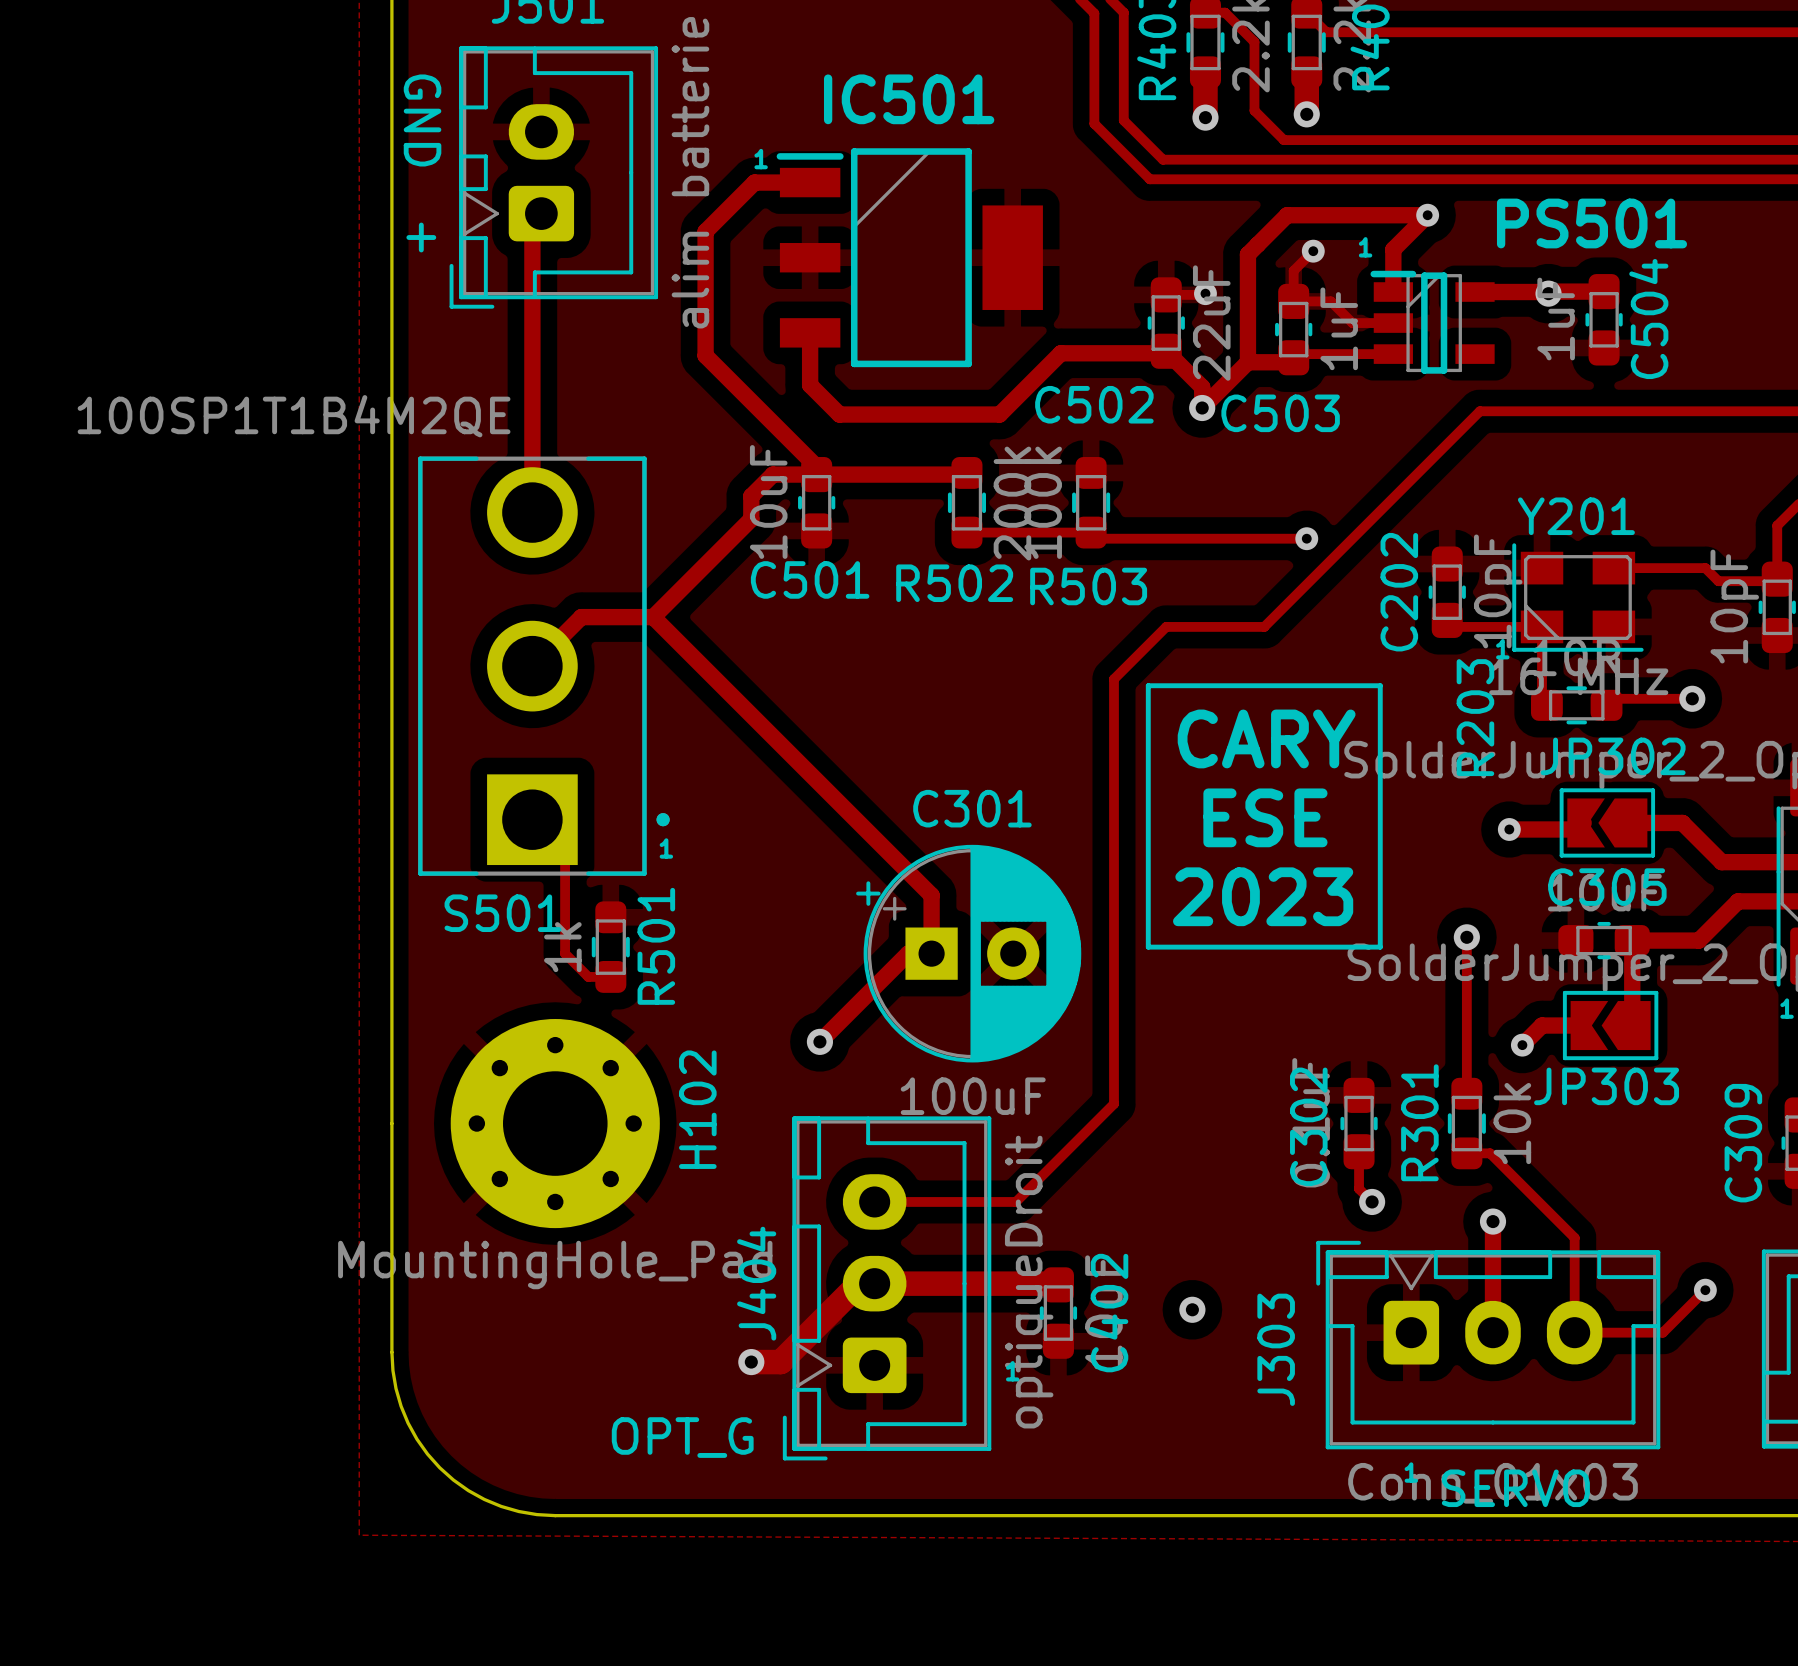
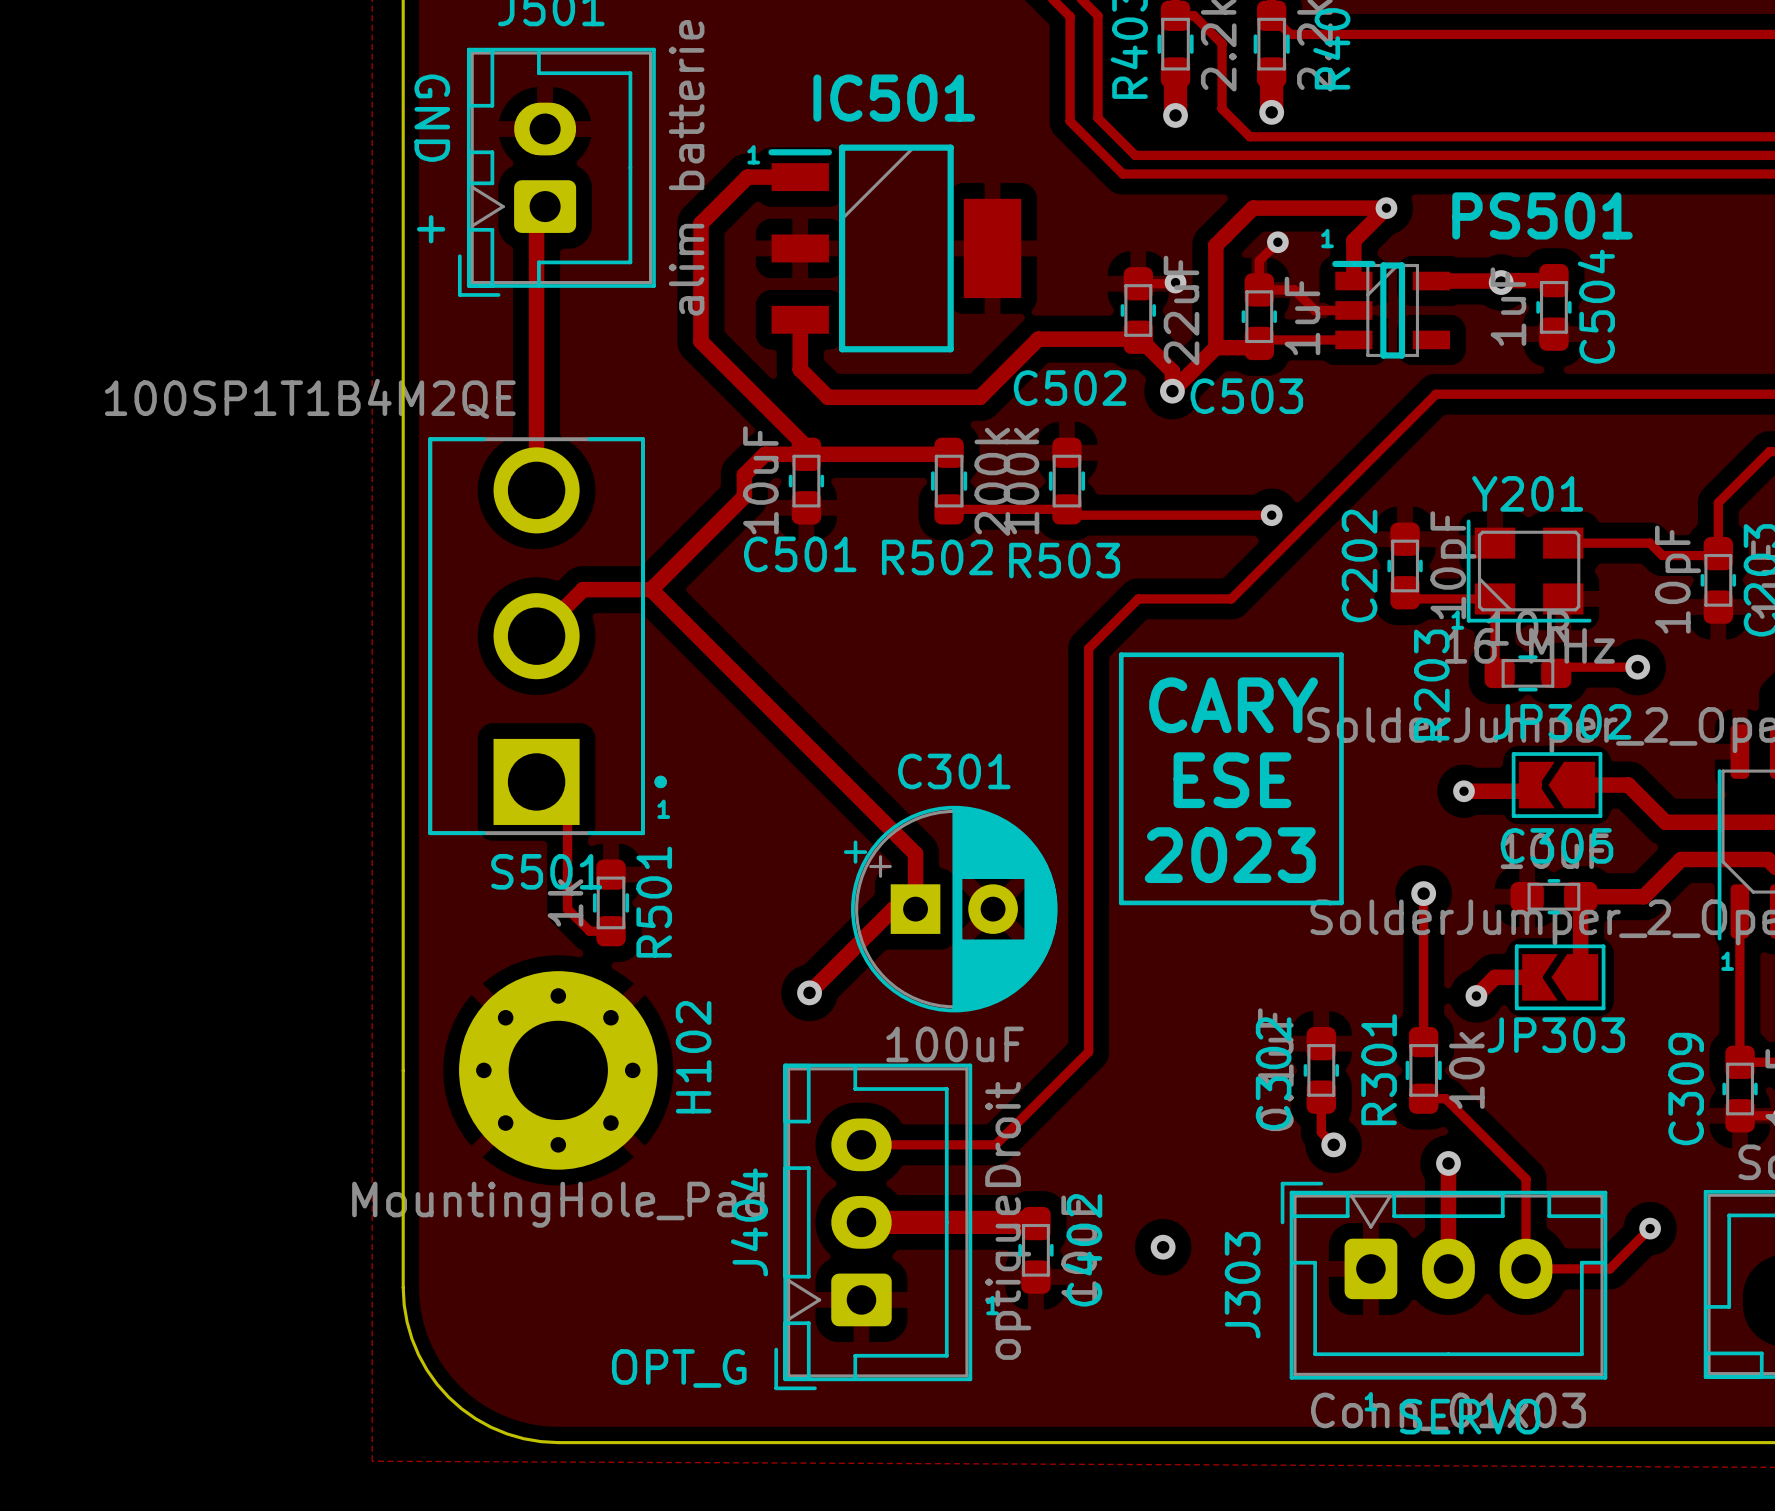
S501 name position: S501 (503, 913) -> S501 (546, 871)
track: (874, 1283) (859, 1283) (780, 1362) (751, 1362) -> none
via: (751, 1362) -> none

